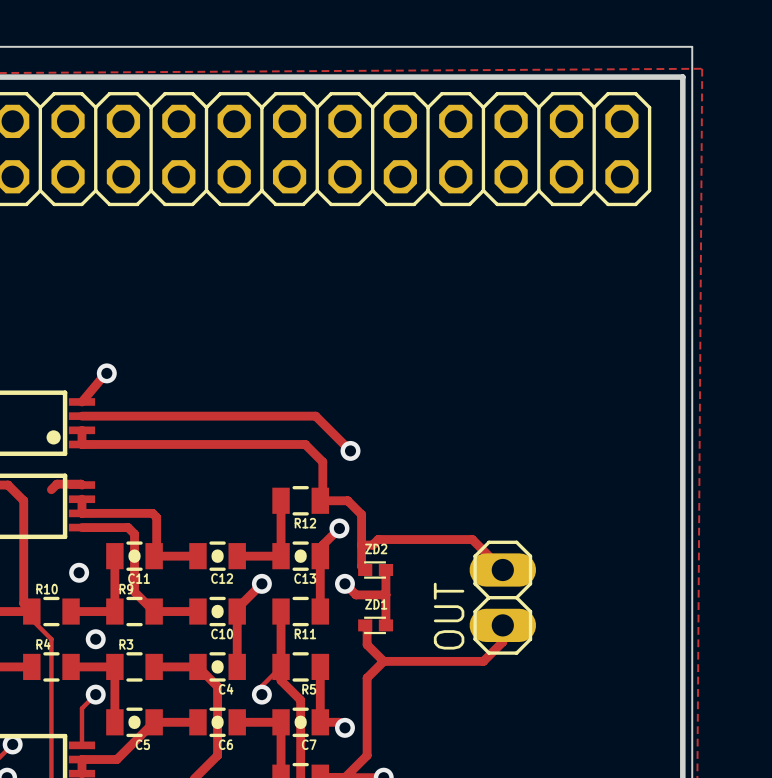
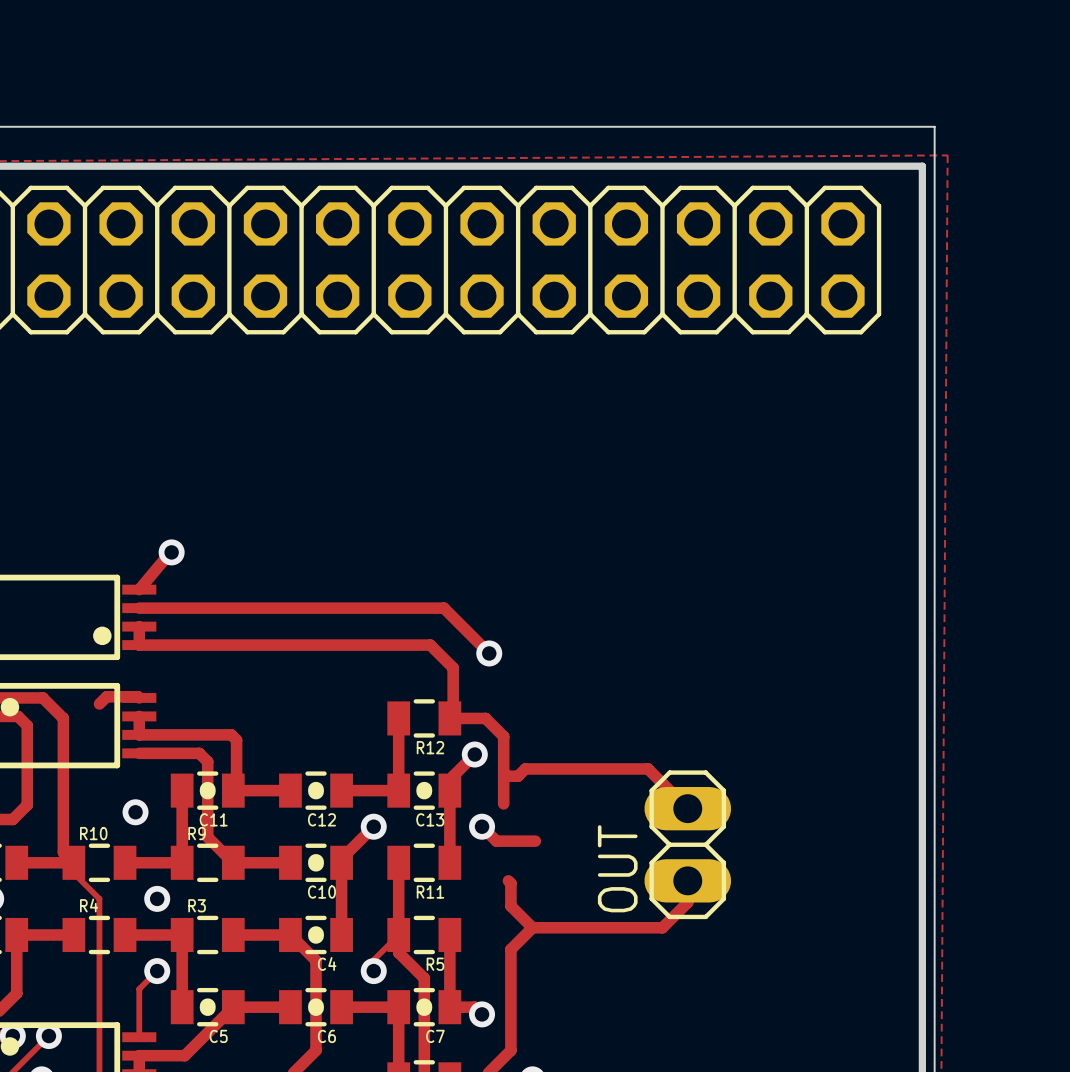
ZD2: (375, 570) -> none
track: (385, 570) (385, 625) -> none
ZD1: (375, 625) -> none

